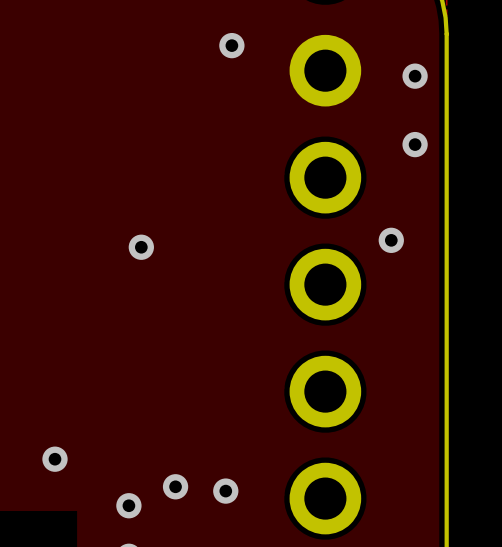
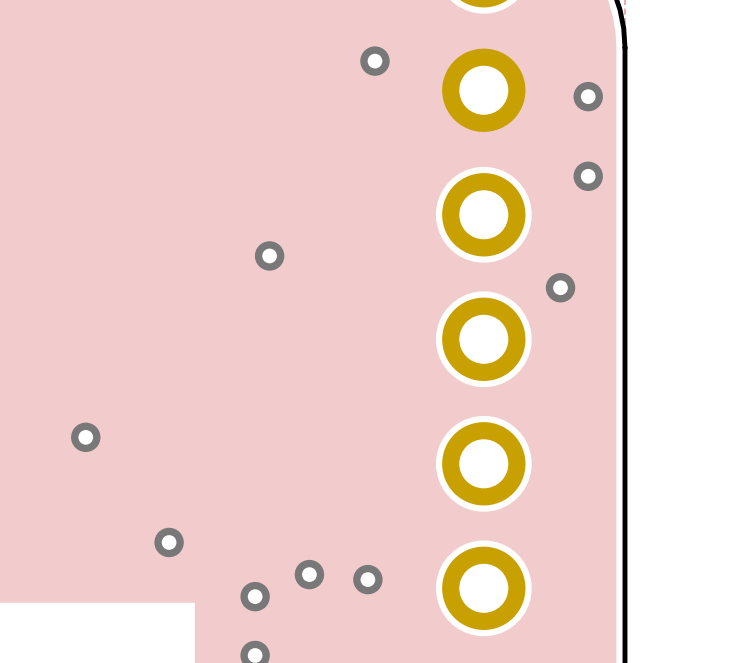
via position: (141, 247) -> (269, 255)

